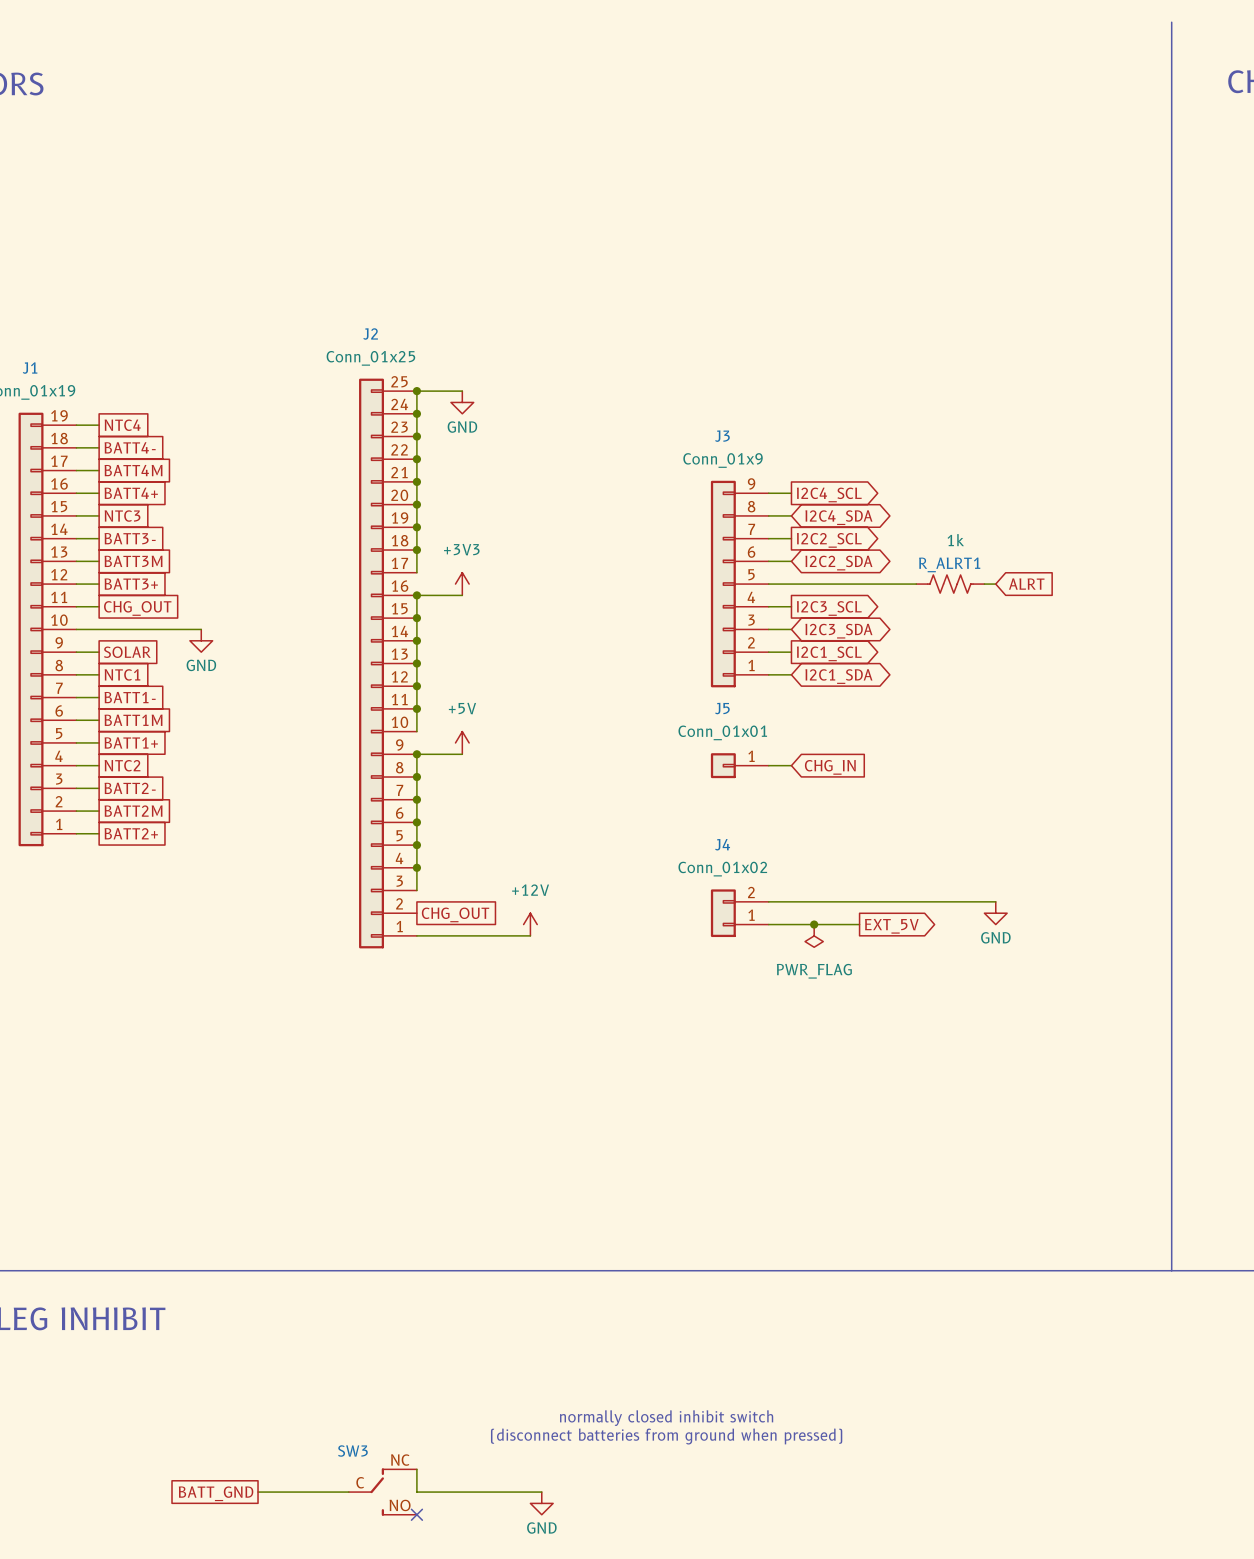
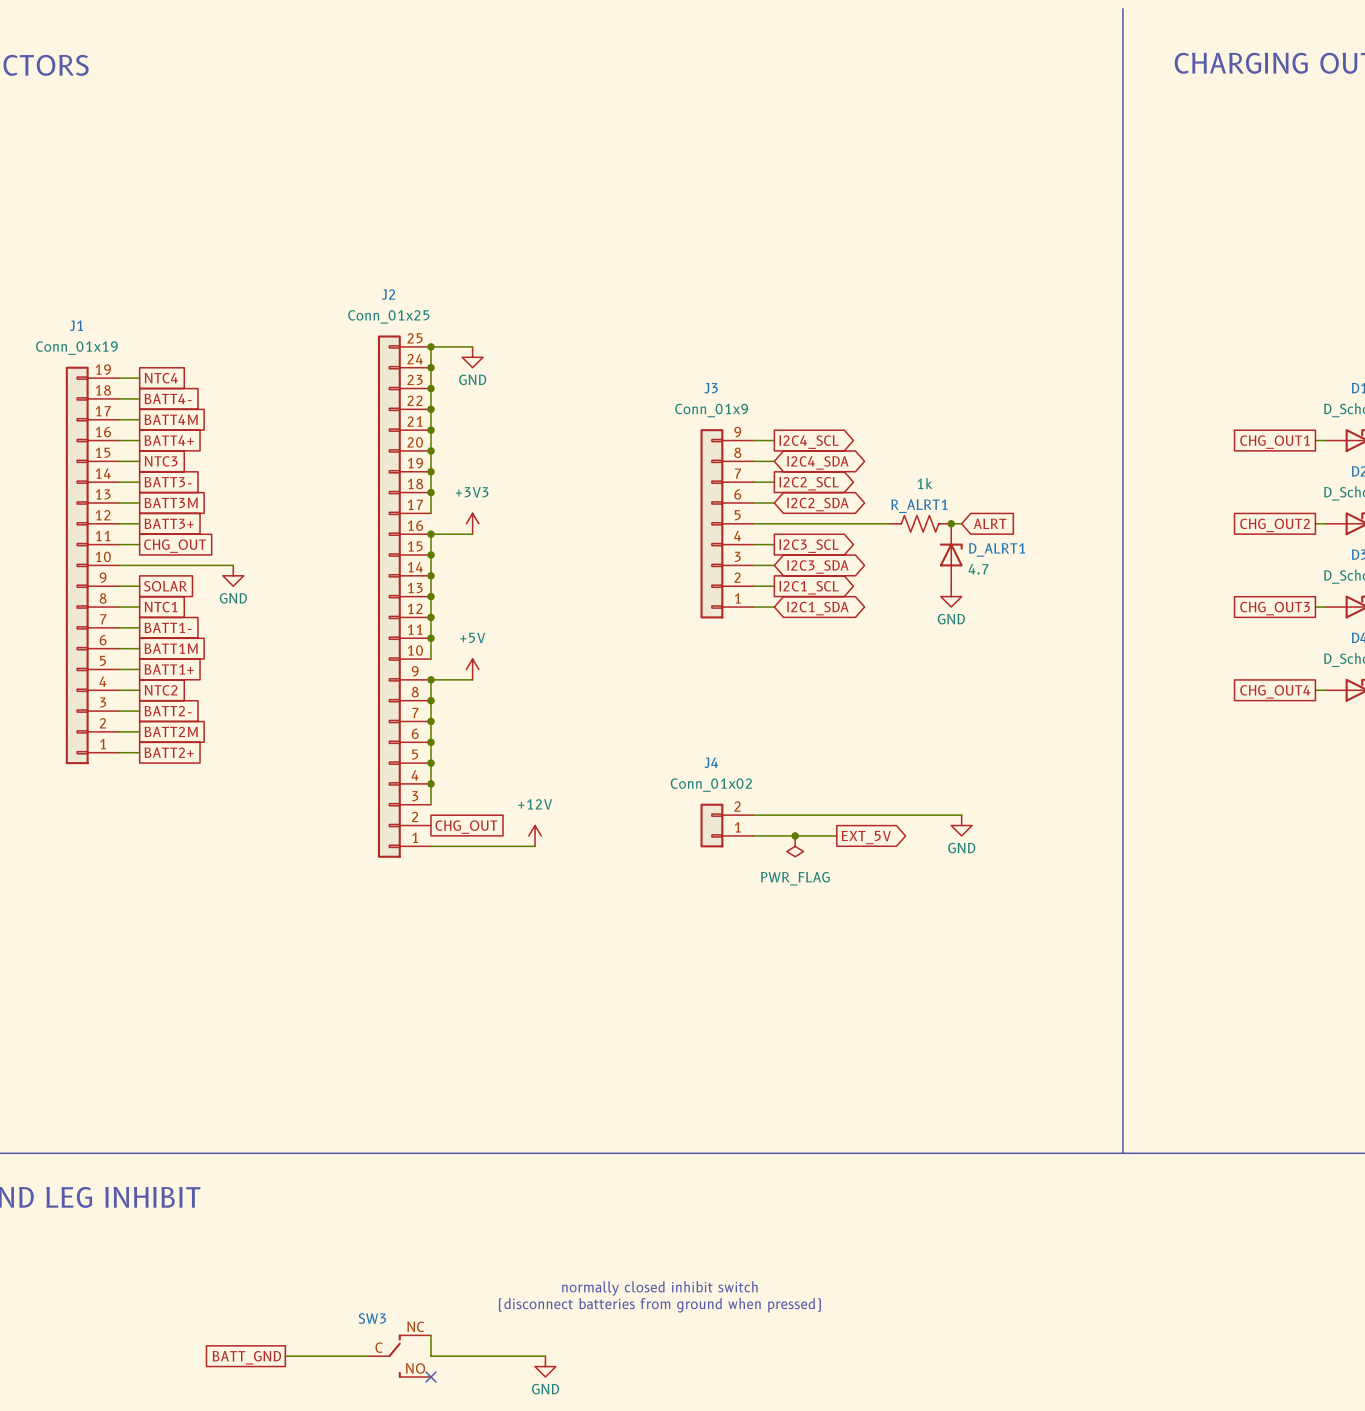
junction: none -> (951, 523)
D_ALRT1: none -> 4.7 (951, 555)
power symbol: none -> GND (951, 596)
J5: Conn_01x01 (739, 765) -> none
wire: (768, 765) (791, 765) -> none
global label: CHG_IN (830, 767) -> none

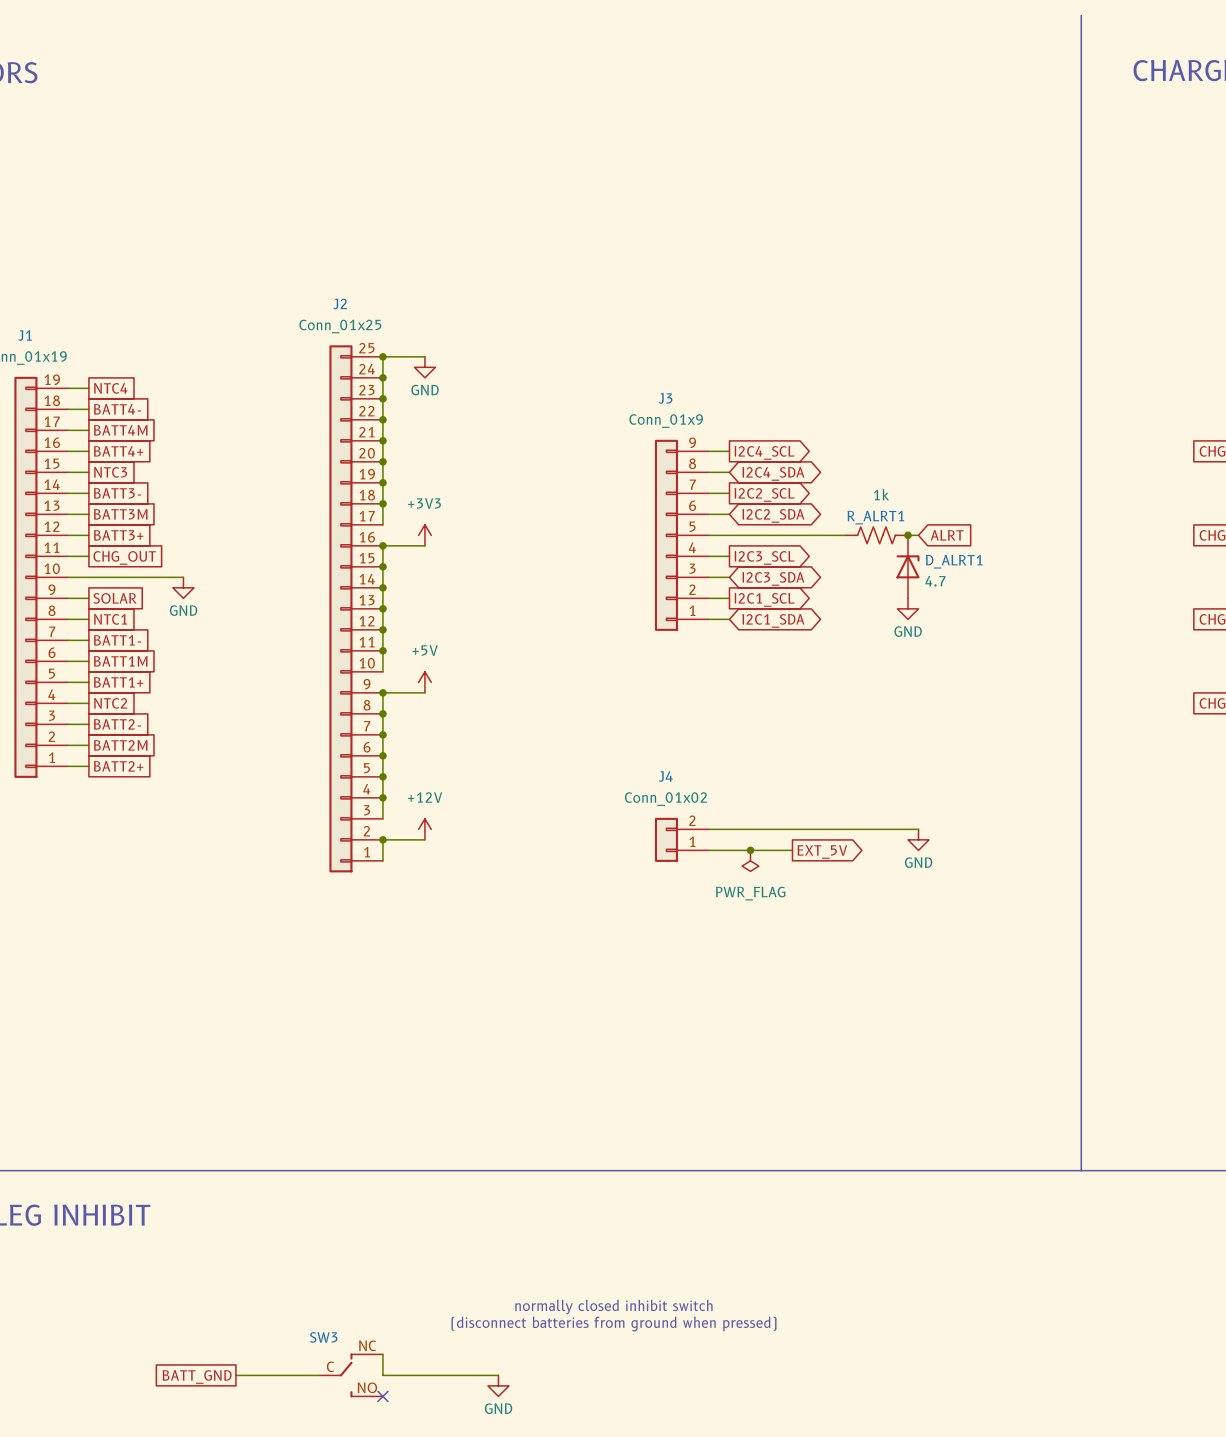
junction: none -> (382, 839)
global label: CHG_OUT (466, 827) -> none
power symbol position: +12V (535, 835) -> +12V (424, 829)
wire: (430, 846) (535, 846) -> (382, 860) (382, 839) (424, 839)

